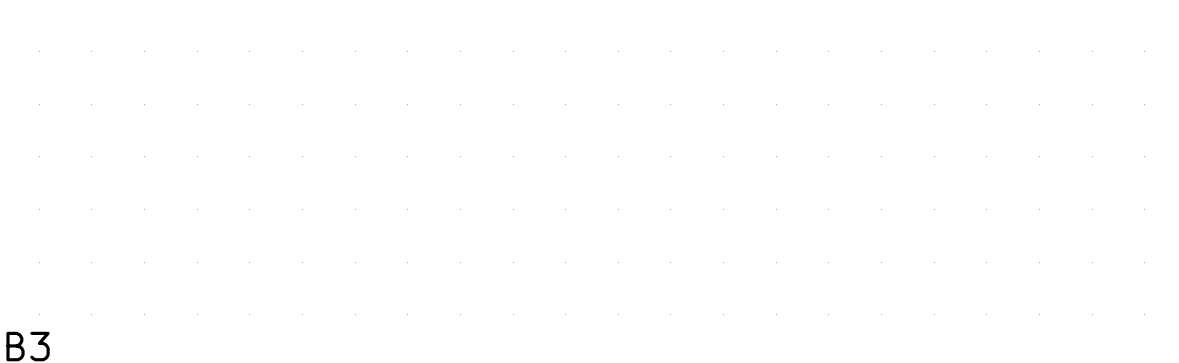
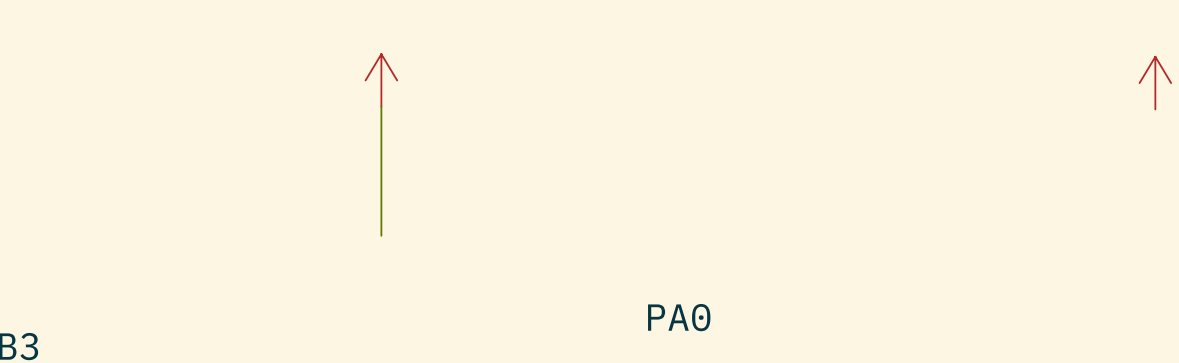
power symbol: none -> (381, 80)
power symbol: none -> (1155, 83)
wire: none -> (381, 106) (381, 235)
label: none -> PA0 (679, 317)

